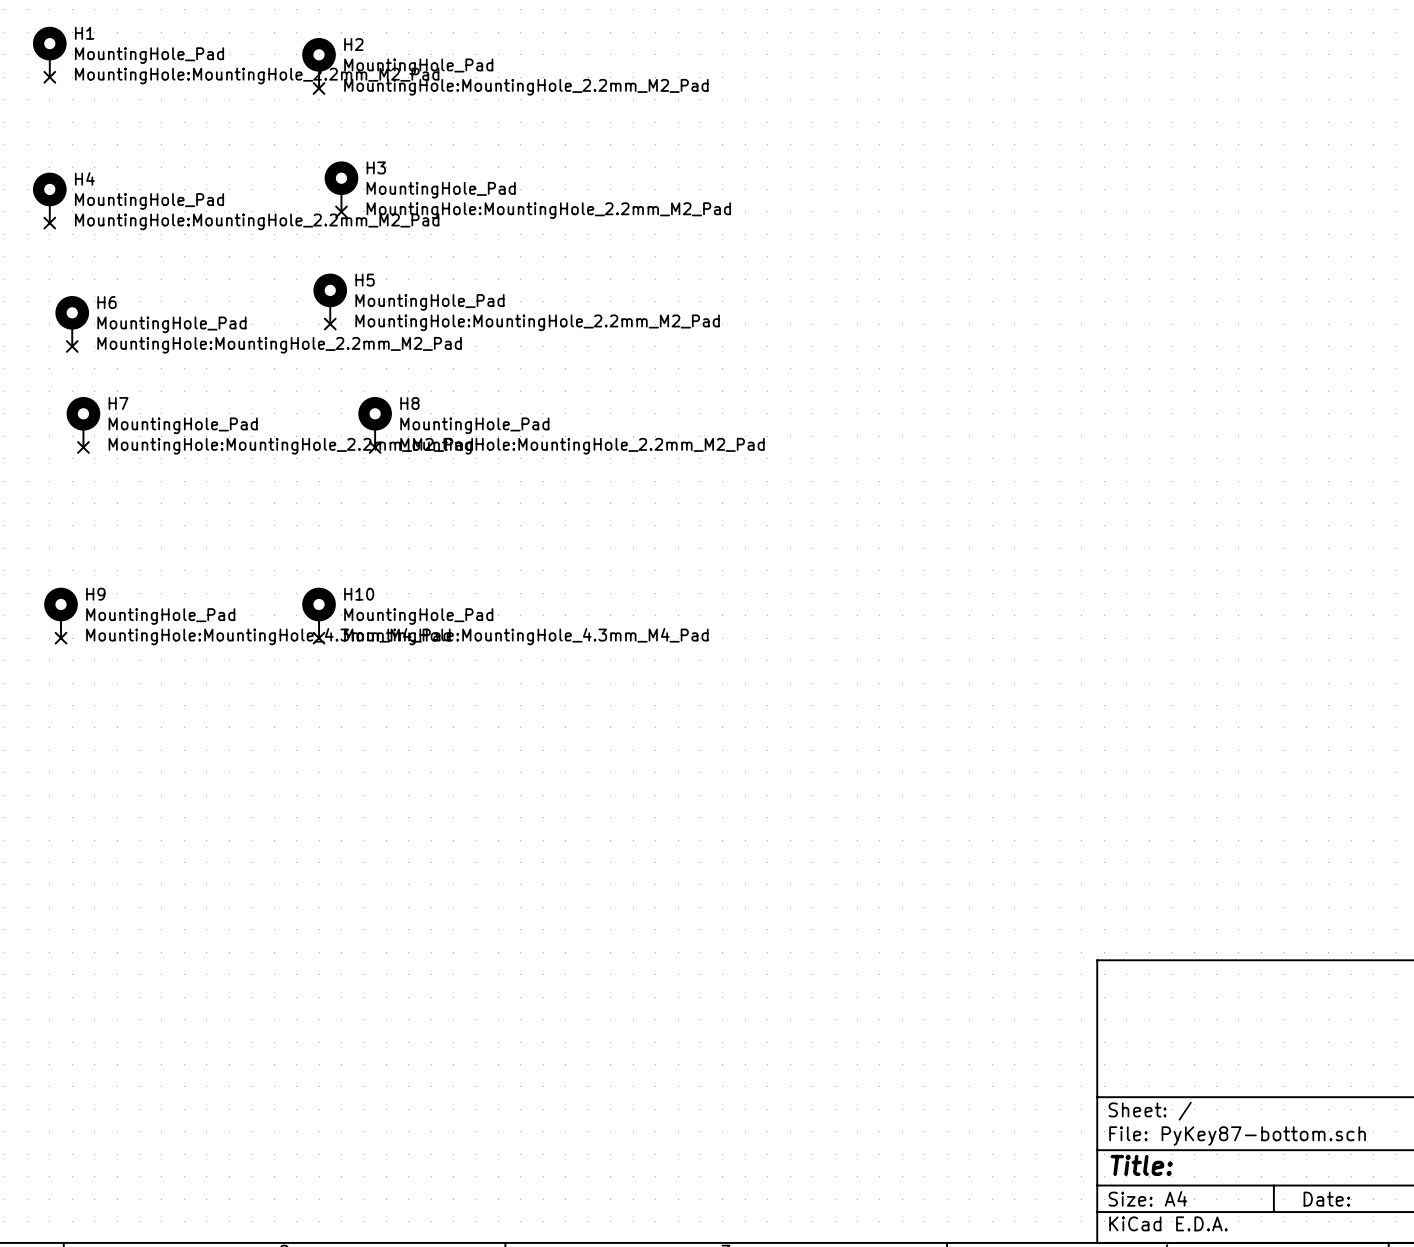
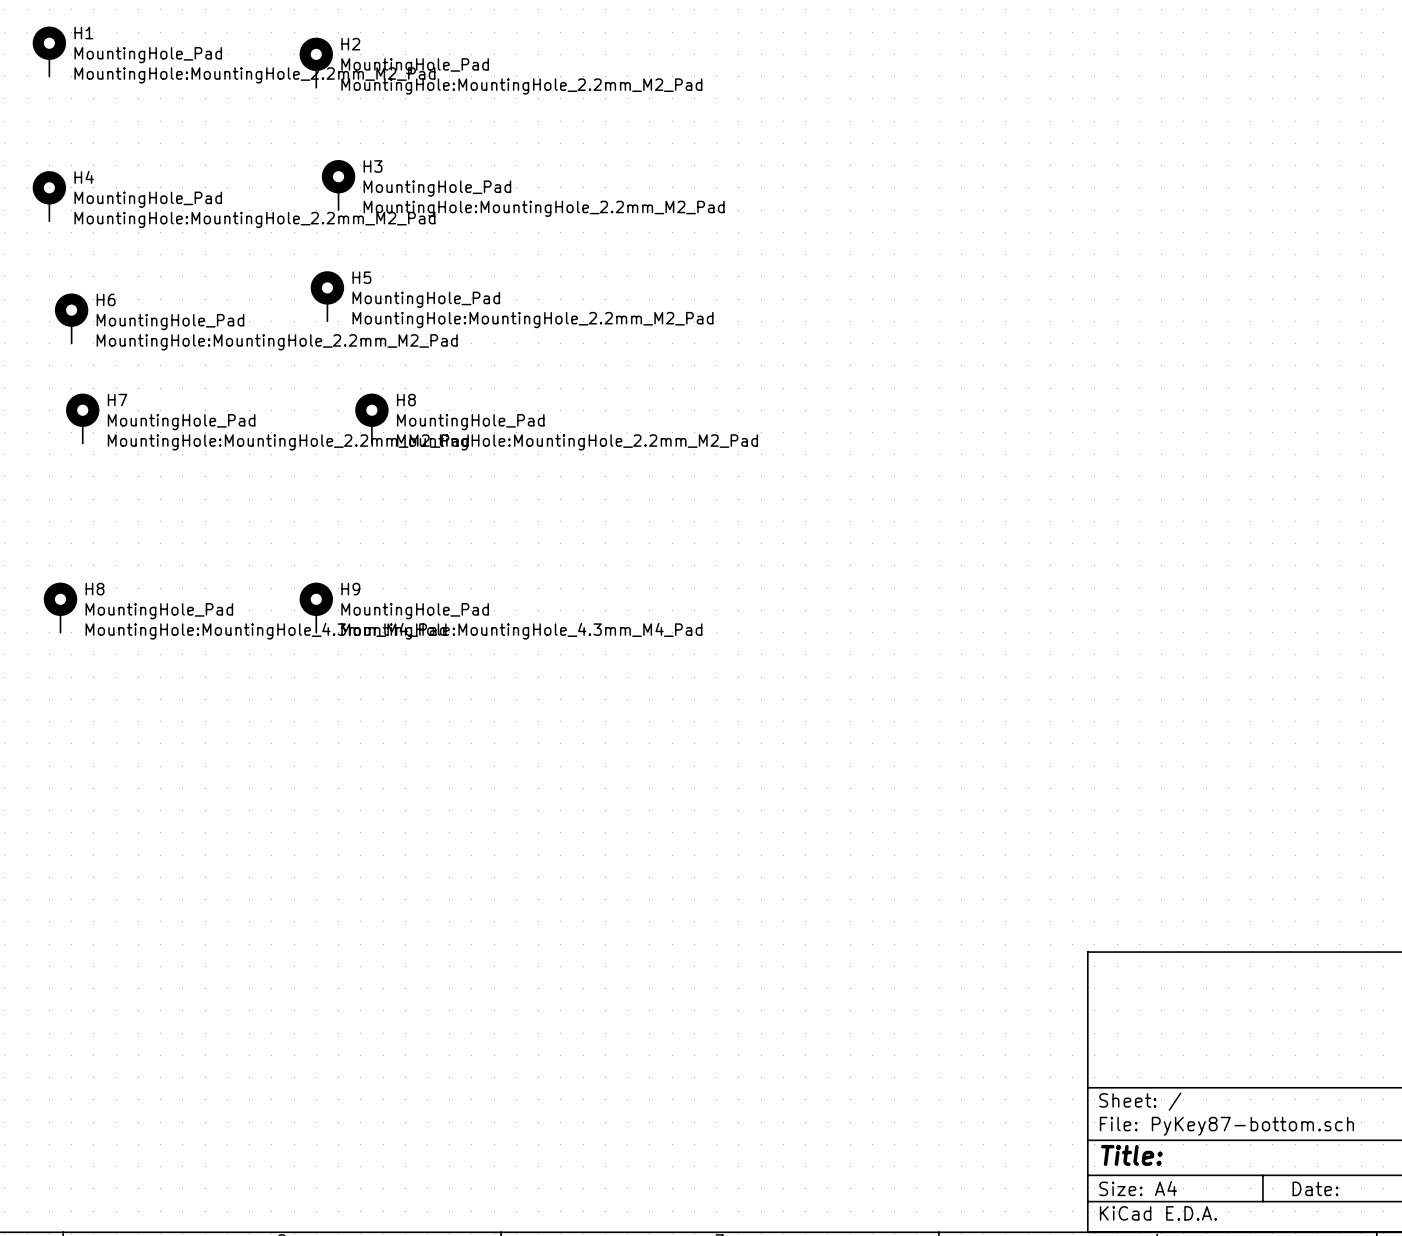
no-connect mark: (49, 77) -> none
no-connect mark: (319, 88) -> none
no-connect mark: (341, 211) -> none
no-connect mark: (49, 223) -> none
no-connect mark: (330, 324) -> none
no-connect mark: (72, 346) -> none
no-connect mark: (83, 447) -> none
no-connect mark: (375, 447) -> none
H9 name: H9 (95, 594) -> H8 (95, 589)
H10 name: H10 (359, 594) -> H9 (350, 589)
no-connect mark: (61, 638) -> none
no-connect mark: (319, 638) -> none

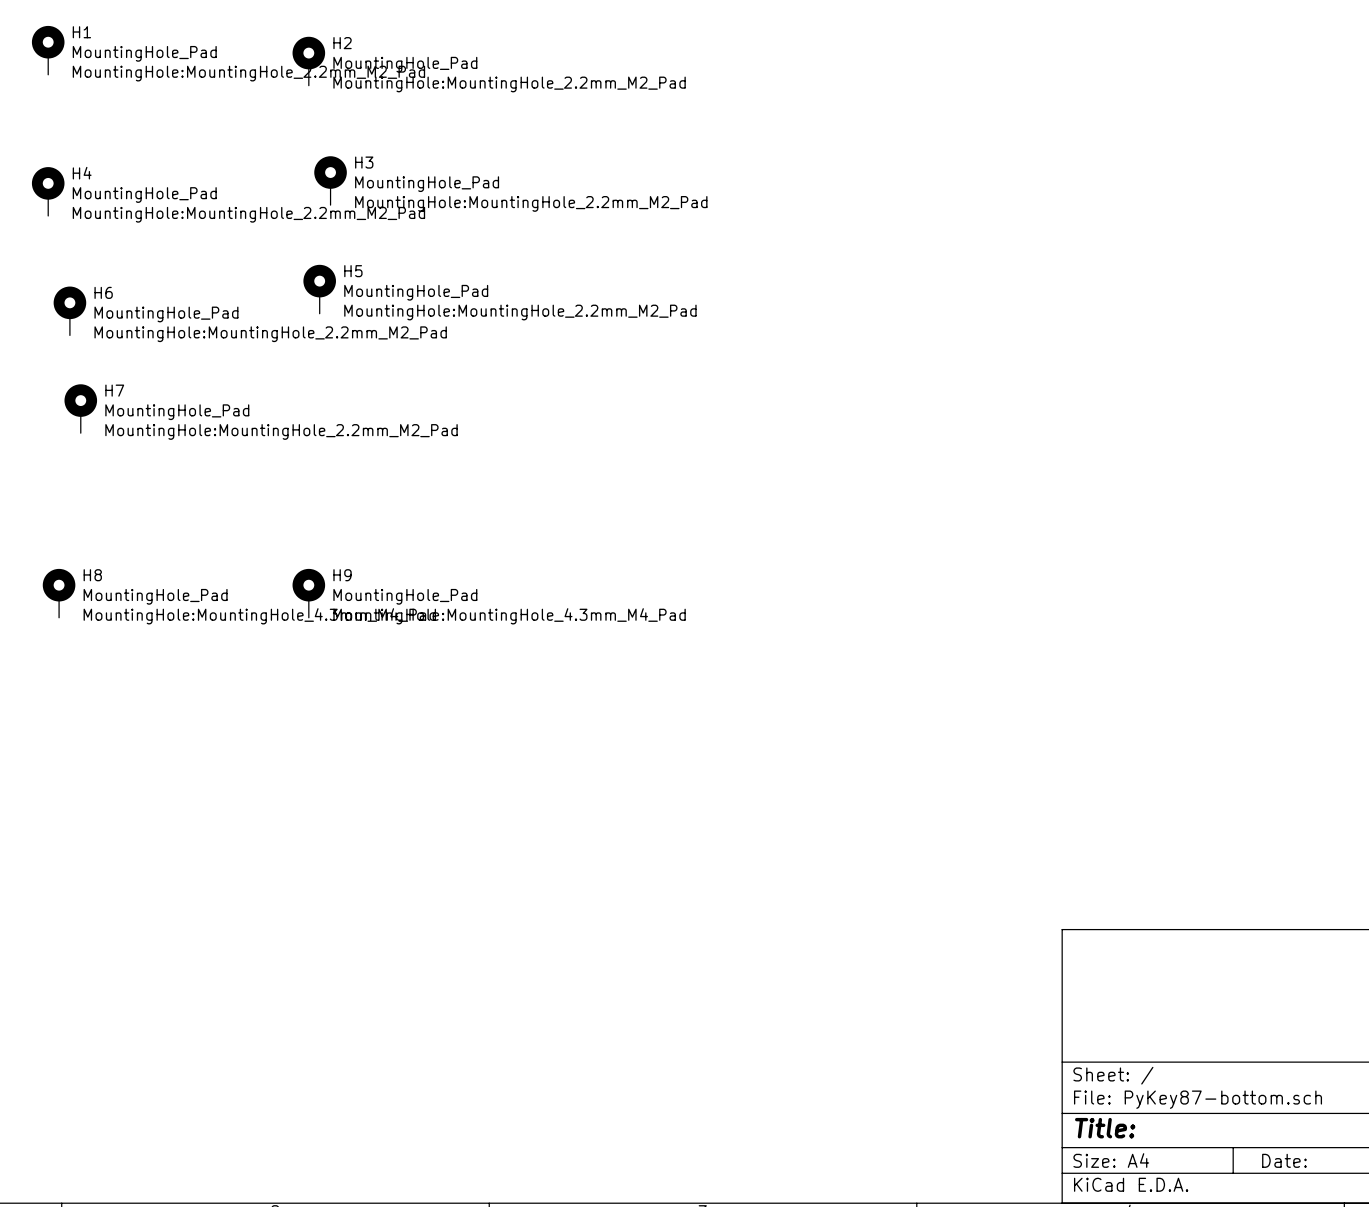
H8: MountingHole_Pad (371, 418) -> none

